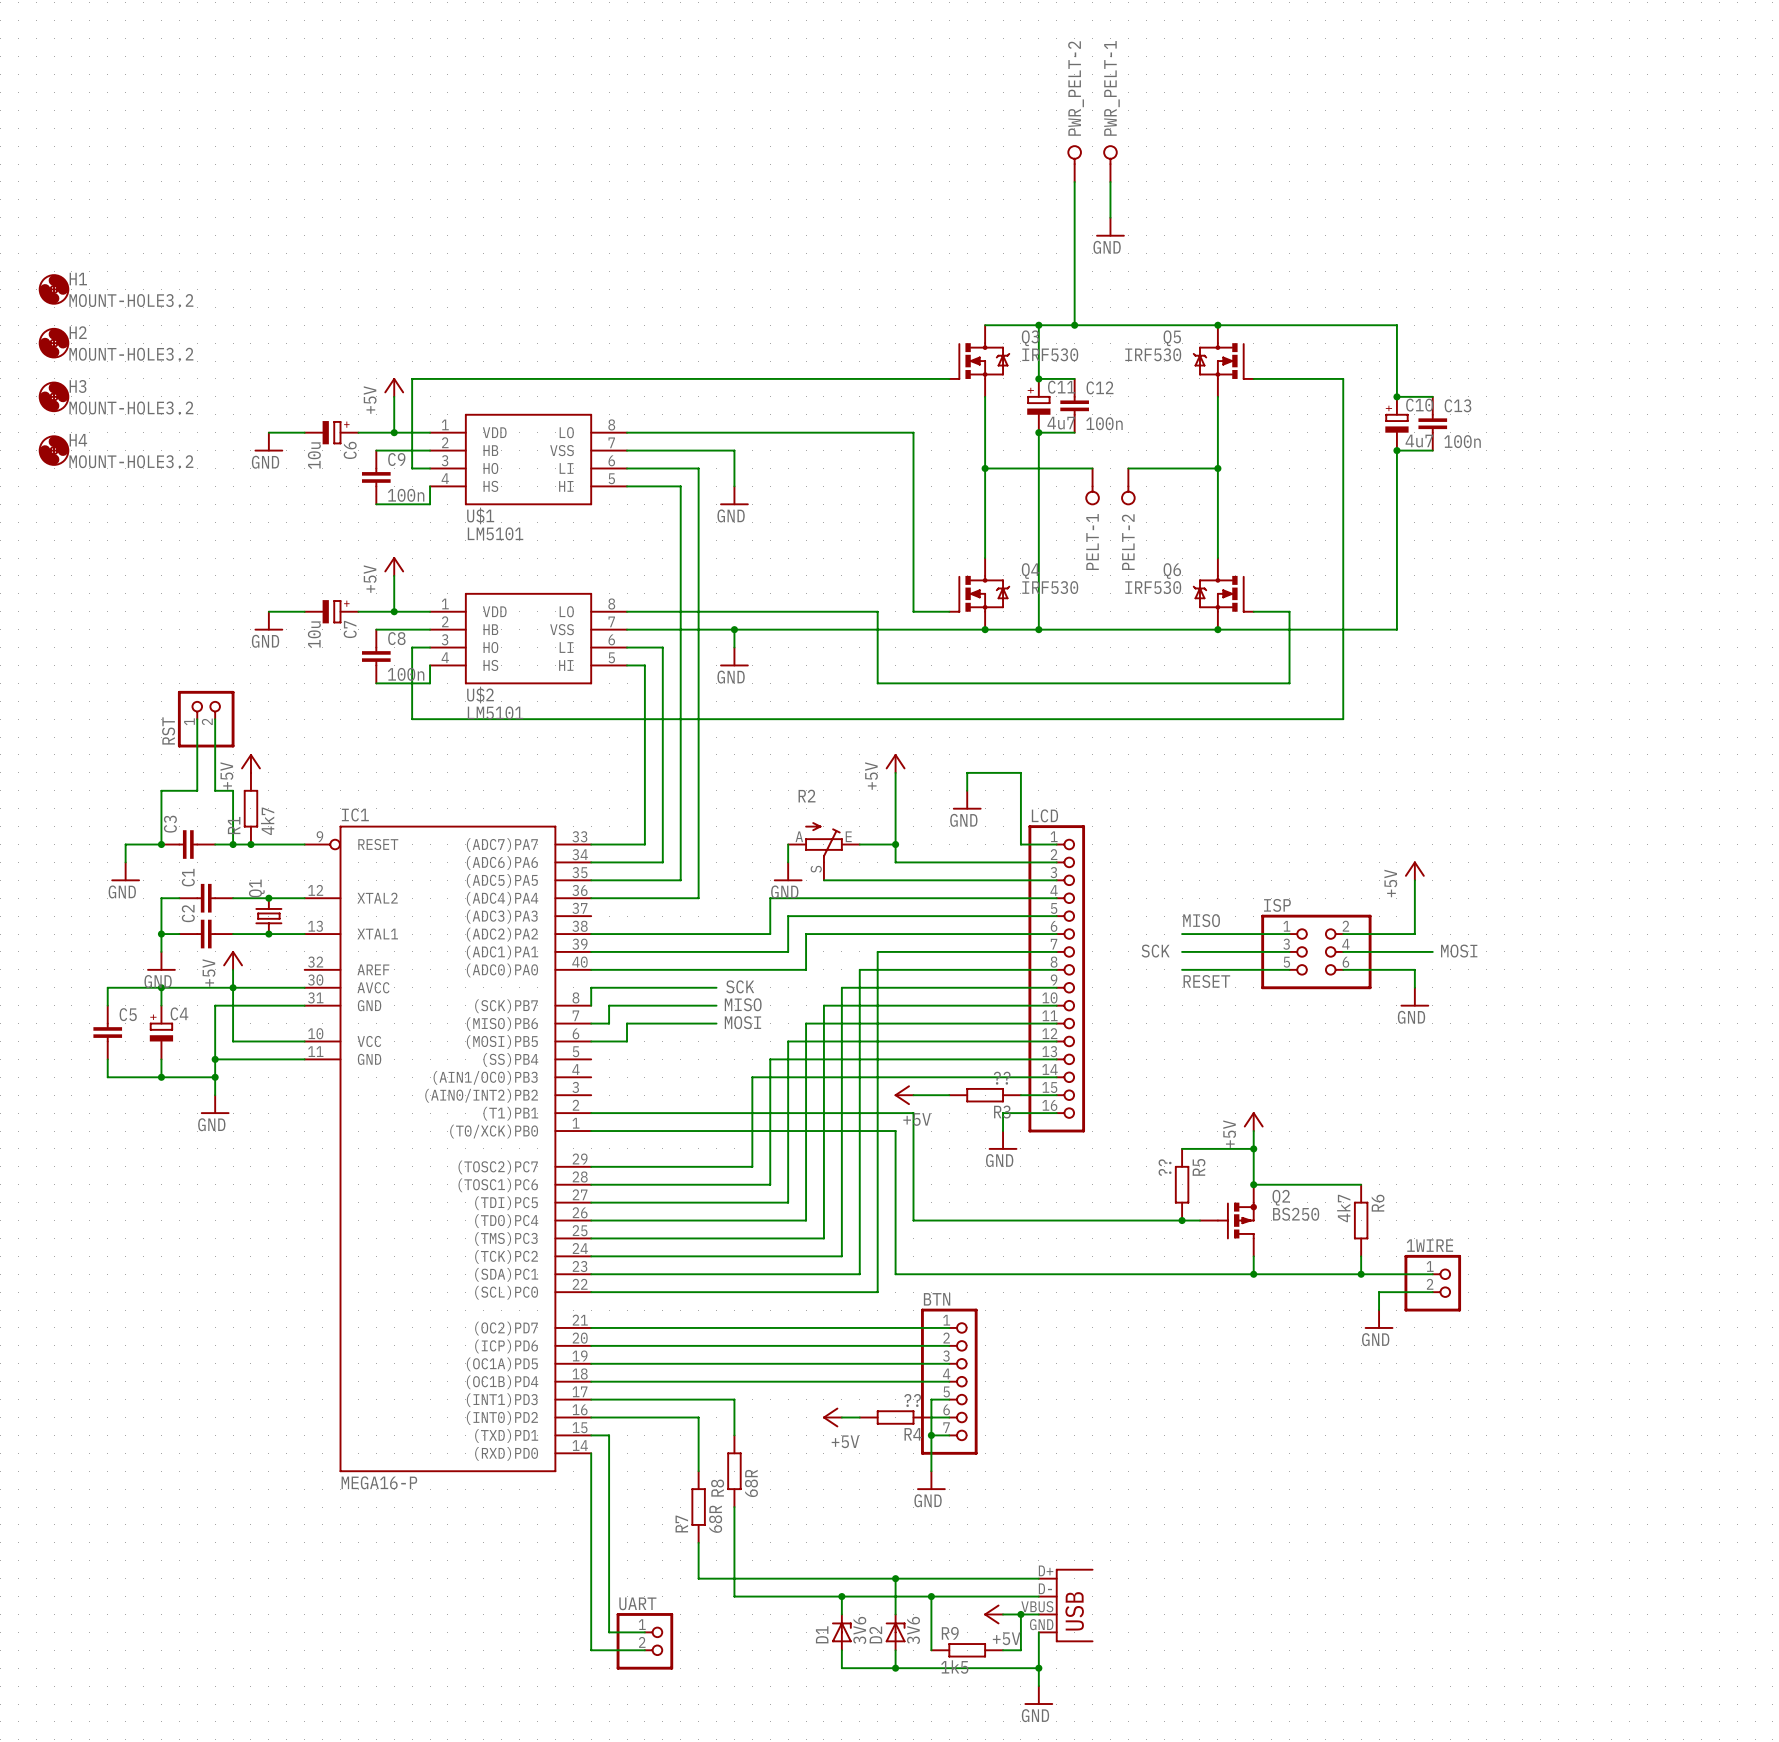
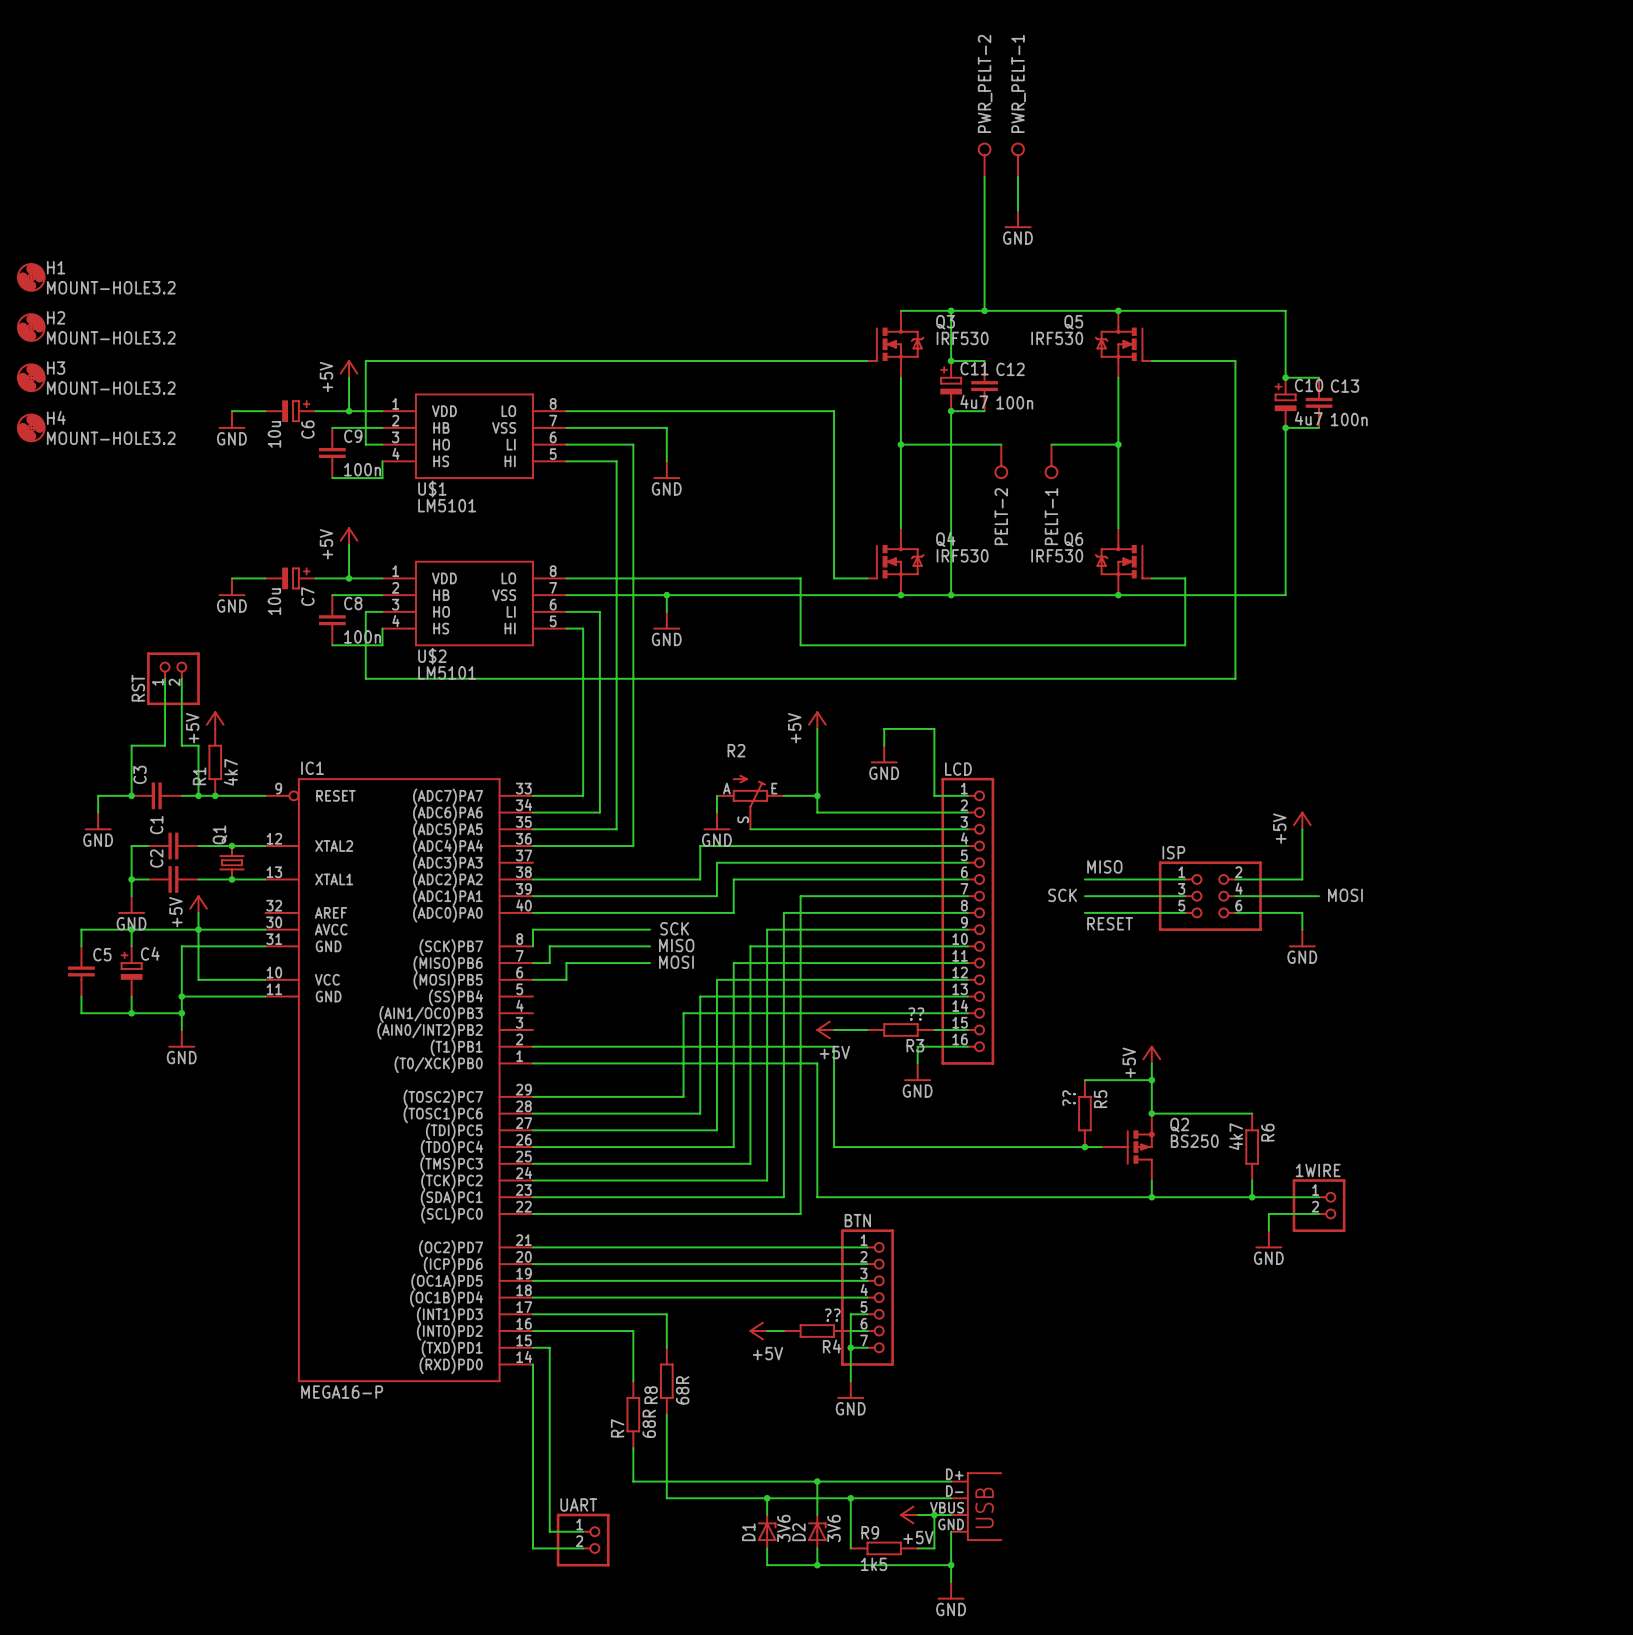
wire: (1128, 468) (1146, 468) -> none
PELT-2: (1128, 486) -> none
PELT-1: none -> (1051, 461)
PELT-1 name: PELT-1 (1092, 542) -> PELT-2 (1001, 516)

